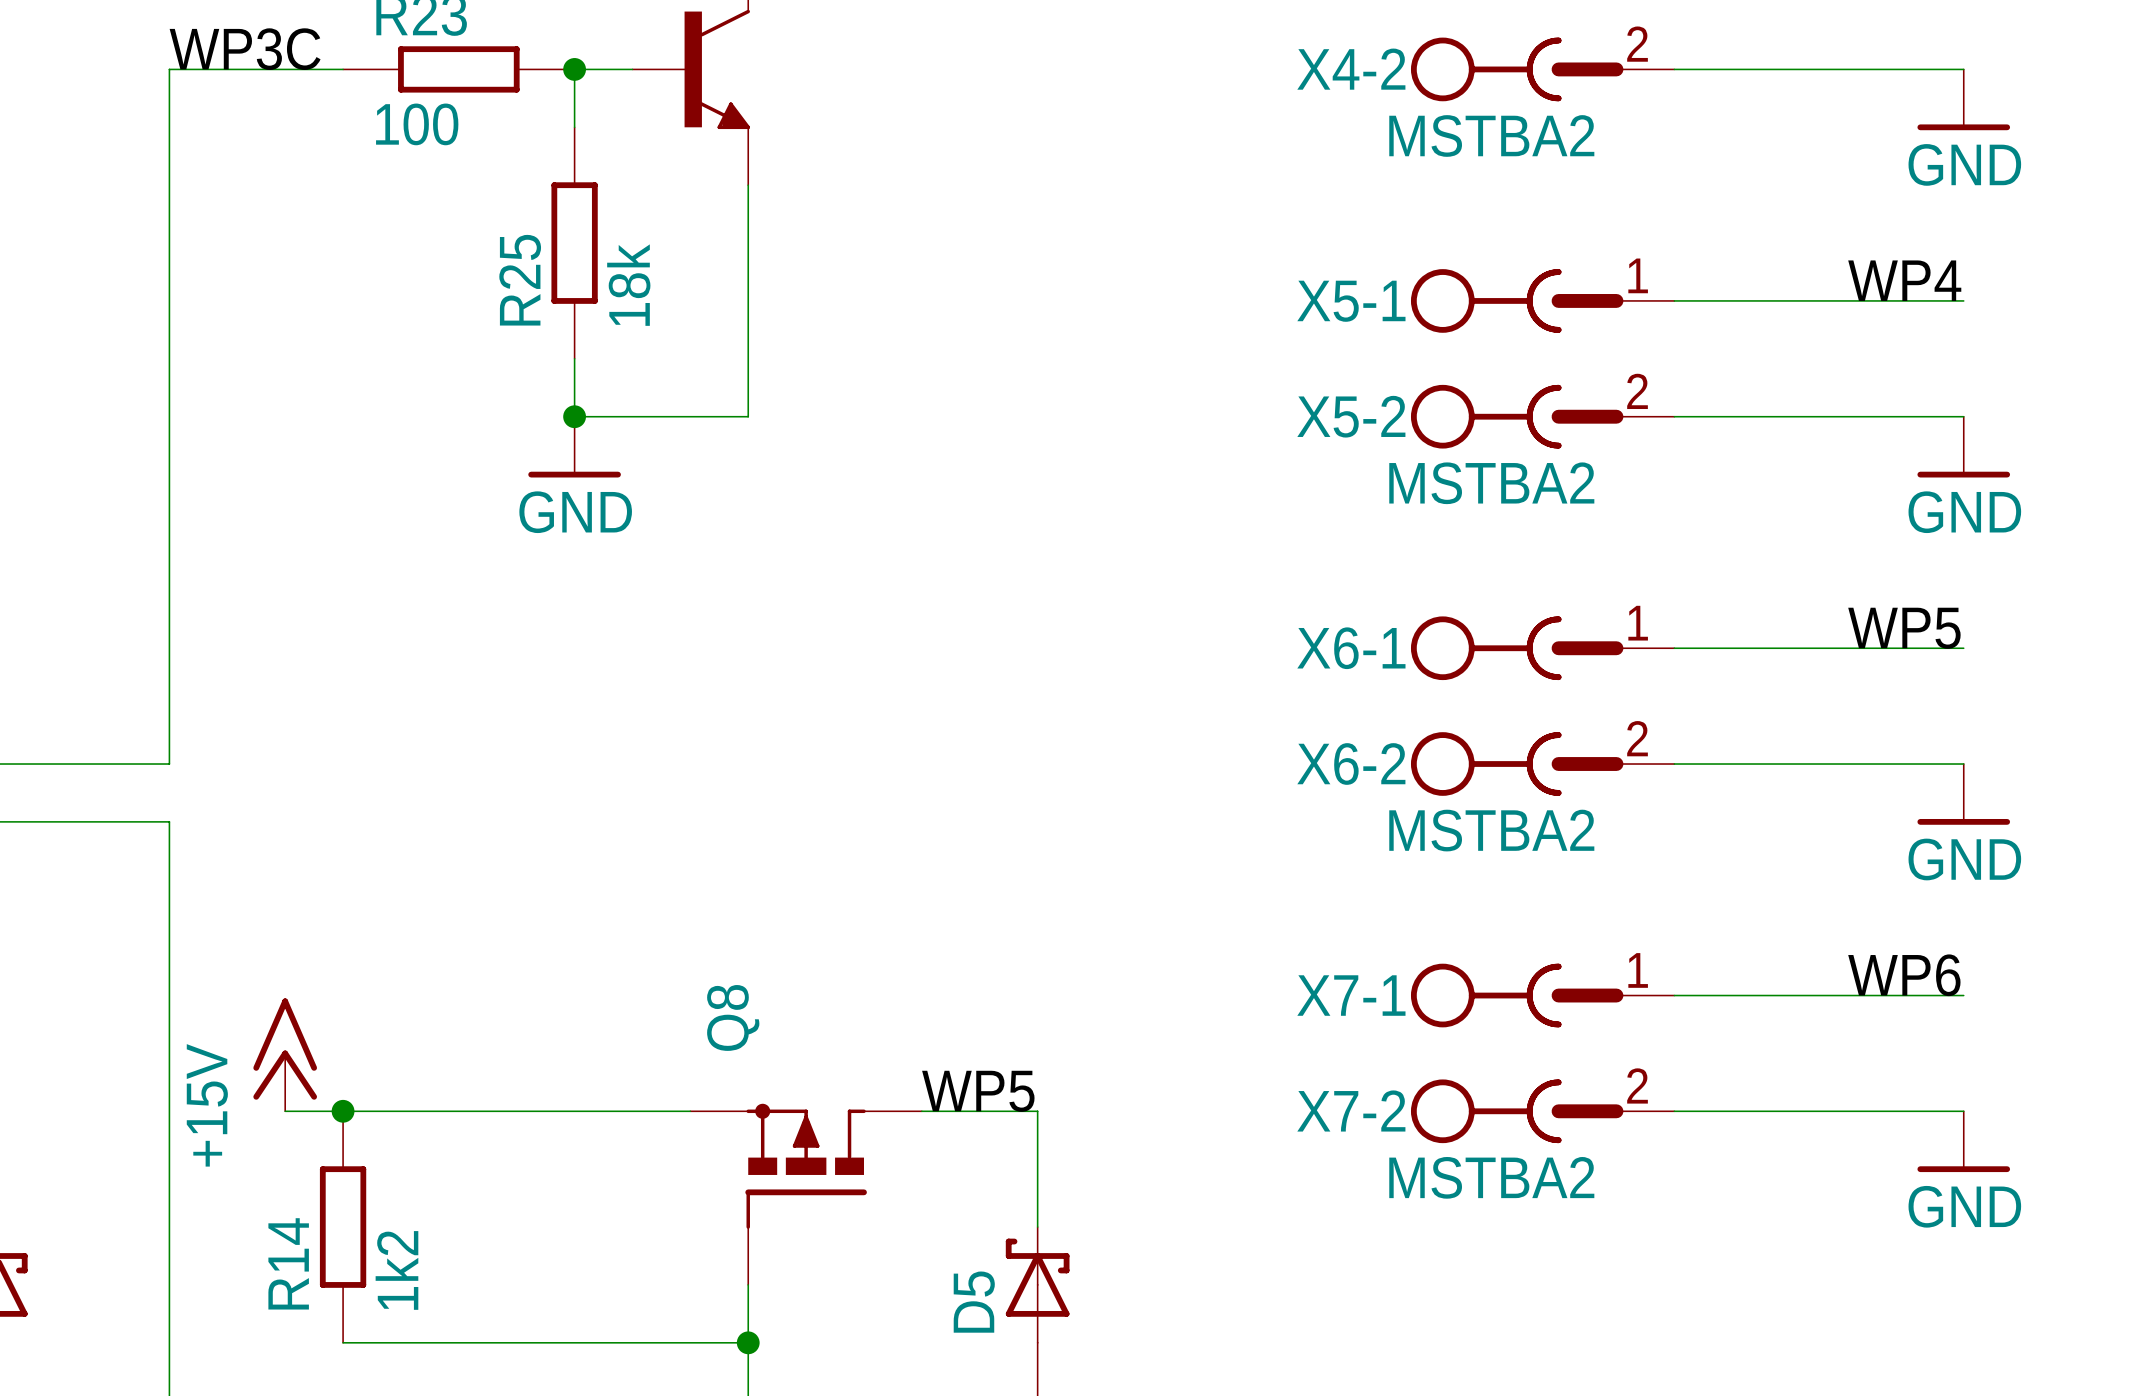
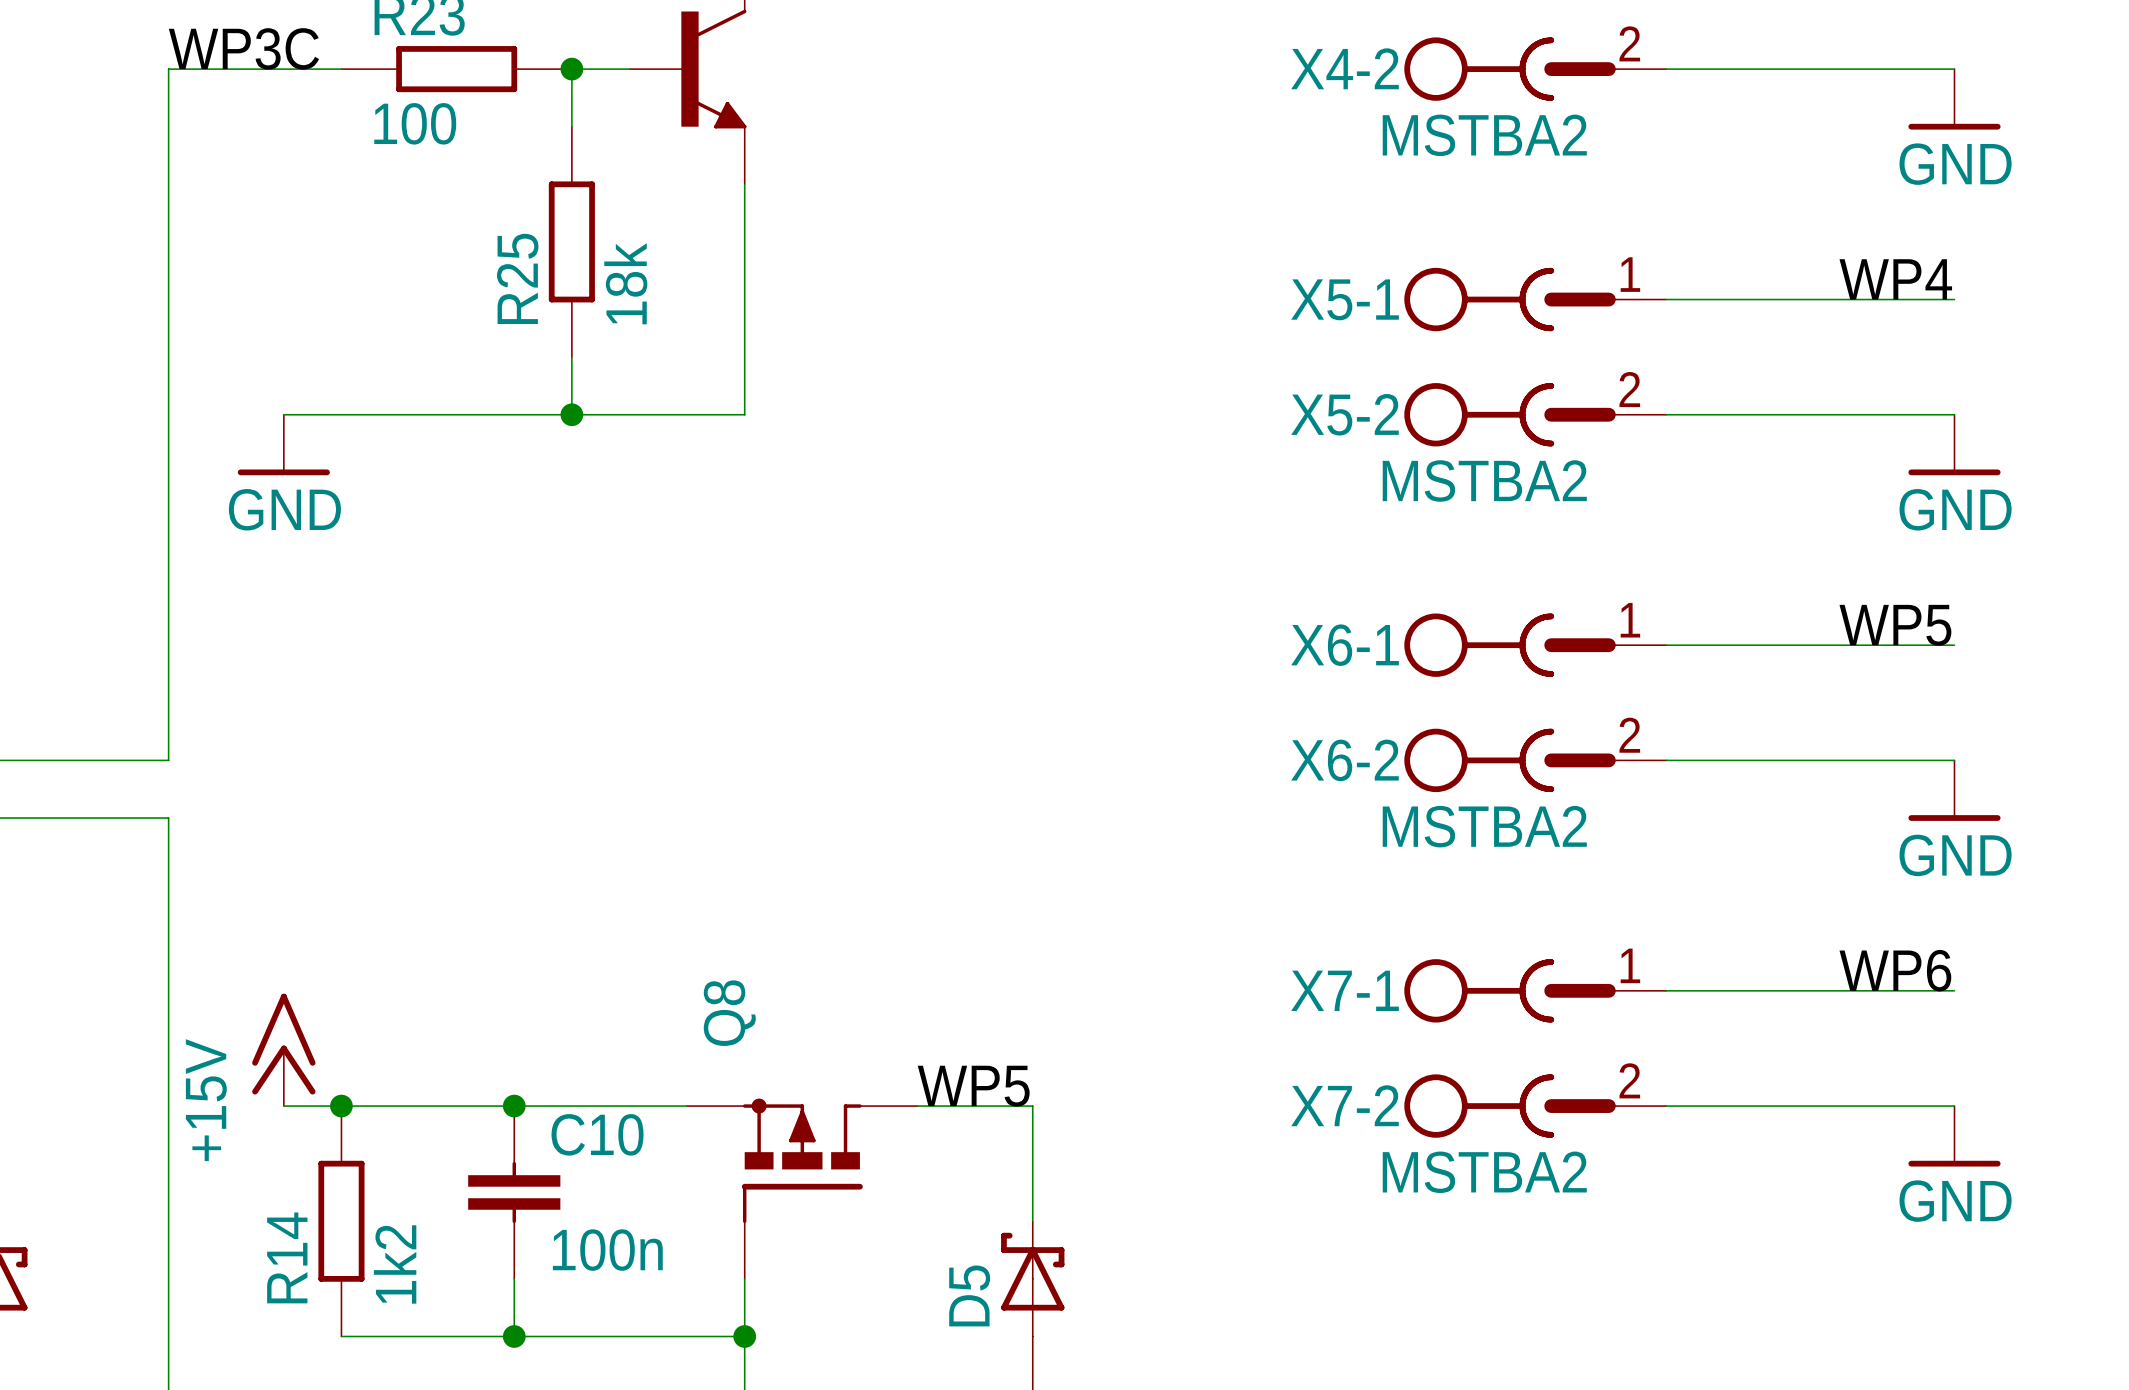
wire: none -> (283, 414) (571, 414)
power symbol position: GND (574, 447) -> GND (283, 445)
junction: none -> (514, 1106)
C10: none -> 100n (514, 1192)
wire: none -> (514, 1278) (514, 1336)
junction: none -> (514, 1336)

